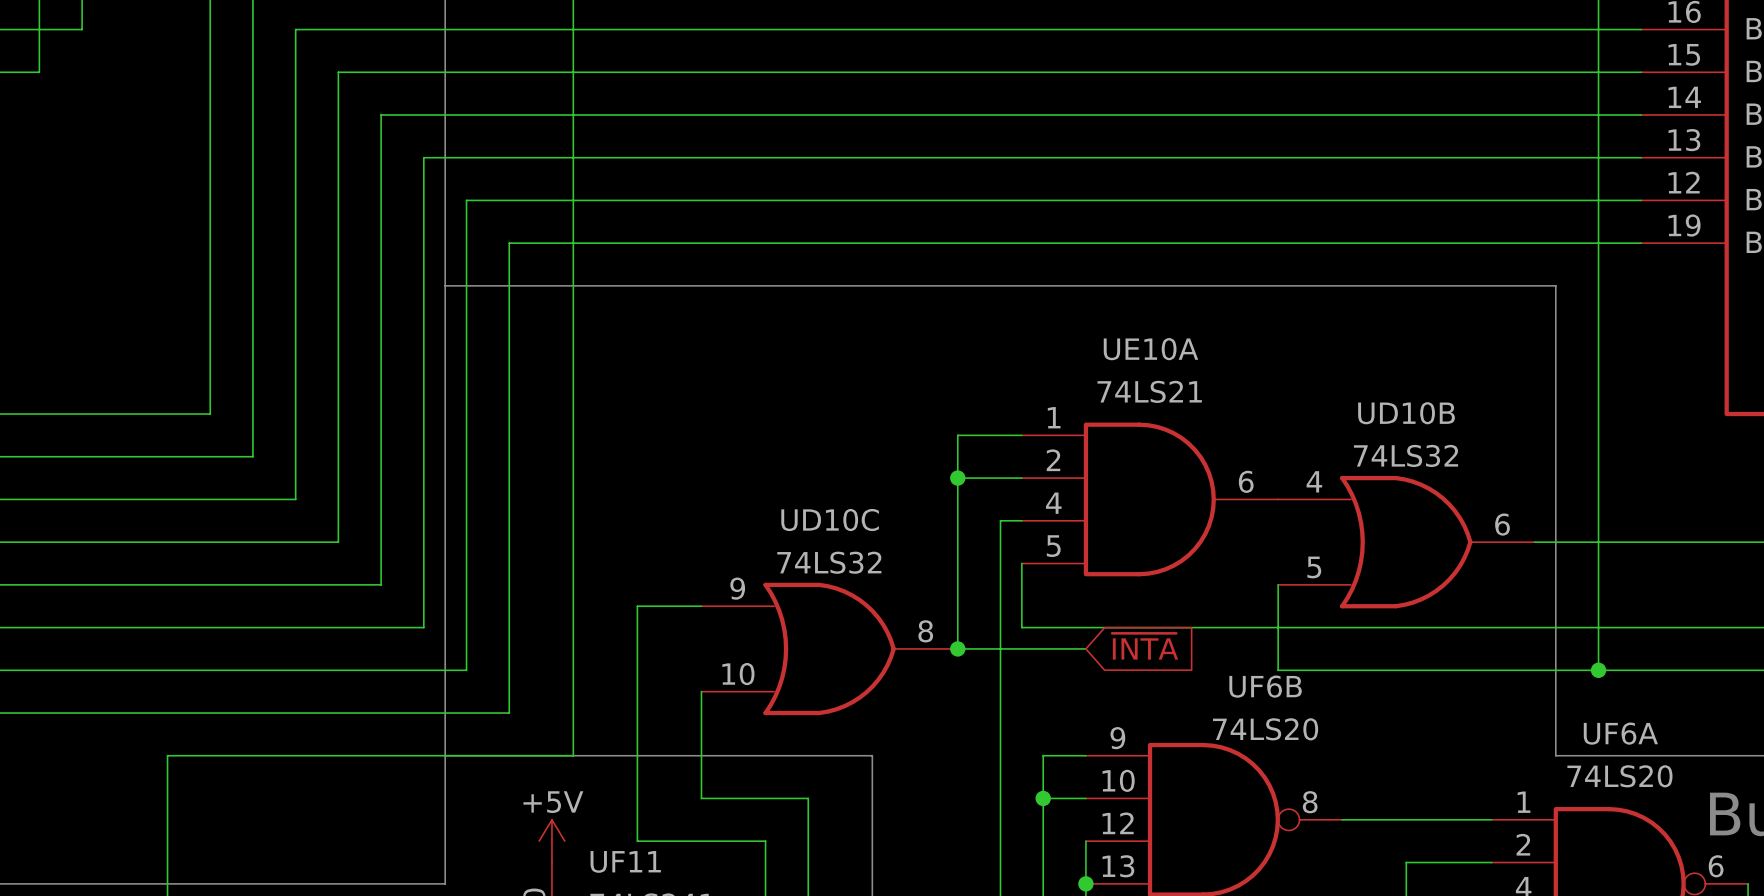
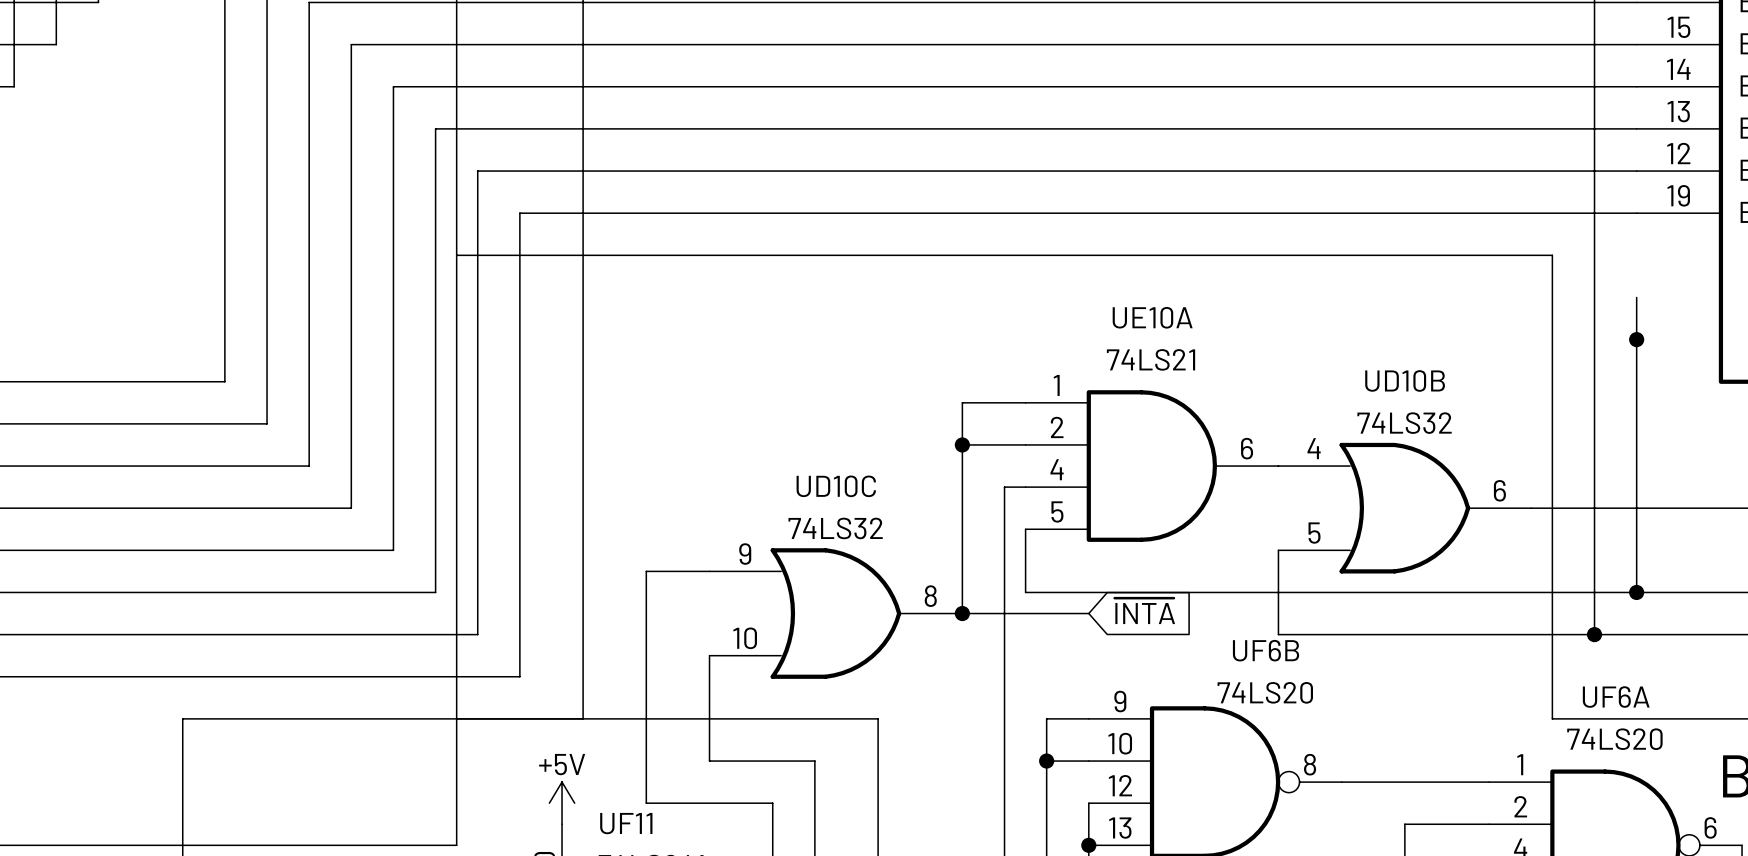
wire: none -> (1636, 297) (1636, 592)
junction: none -> (1636, 339)
junction: none -> (1636, 592)

